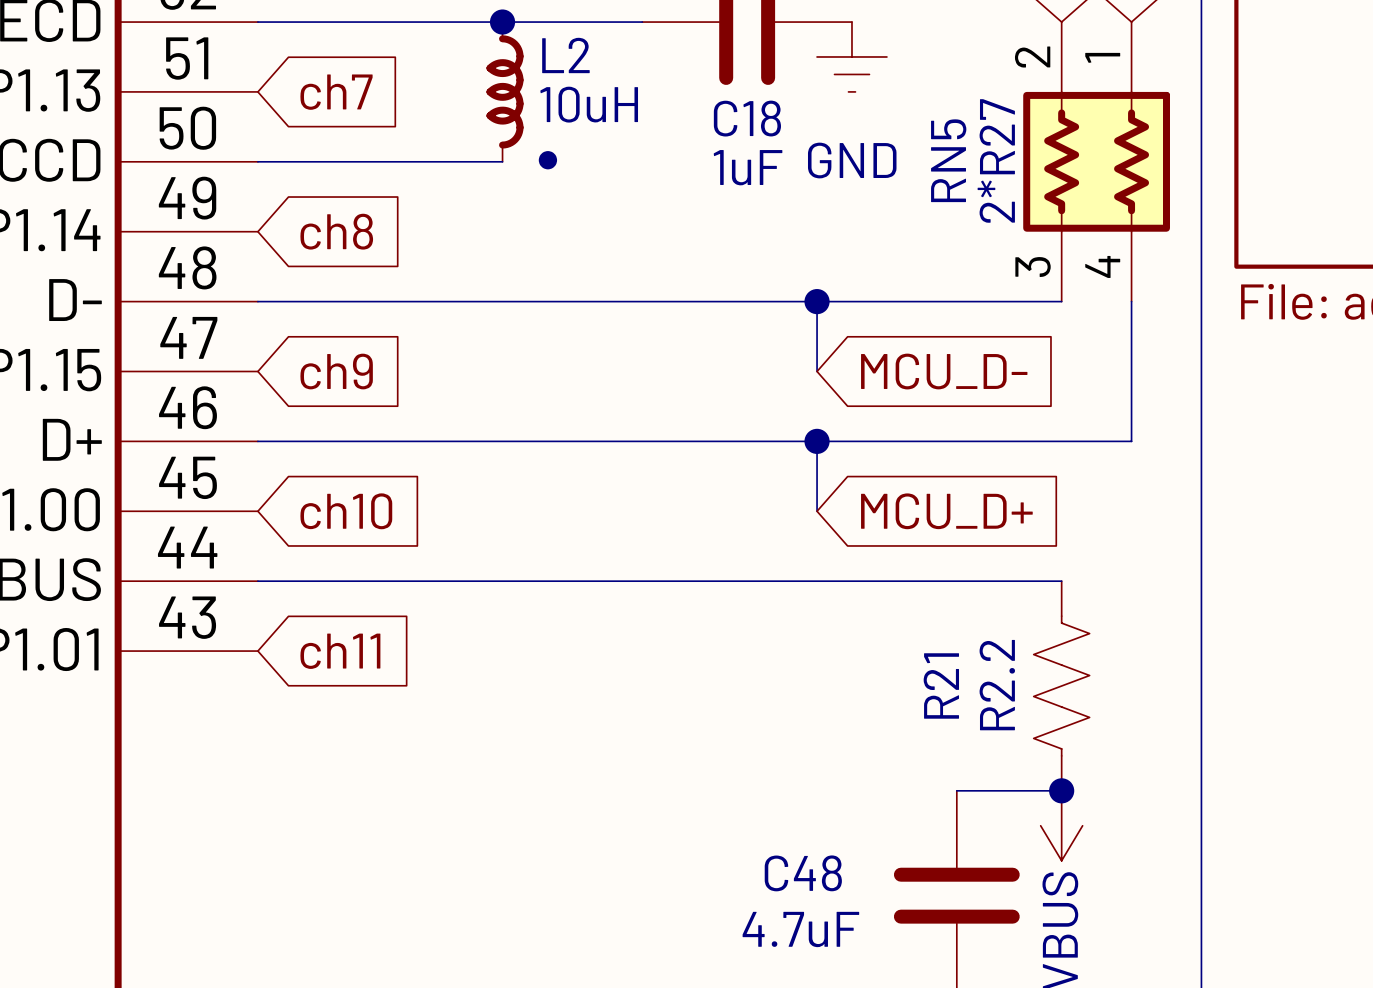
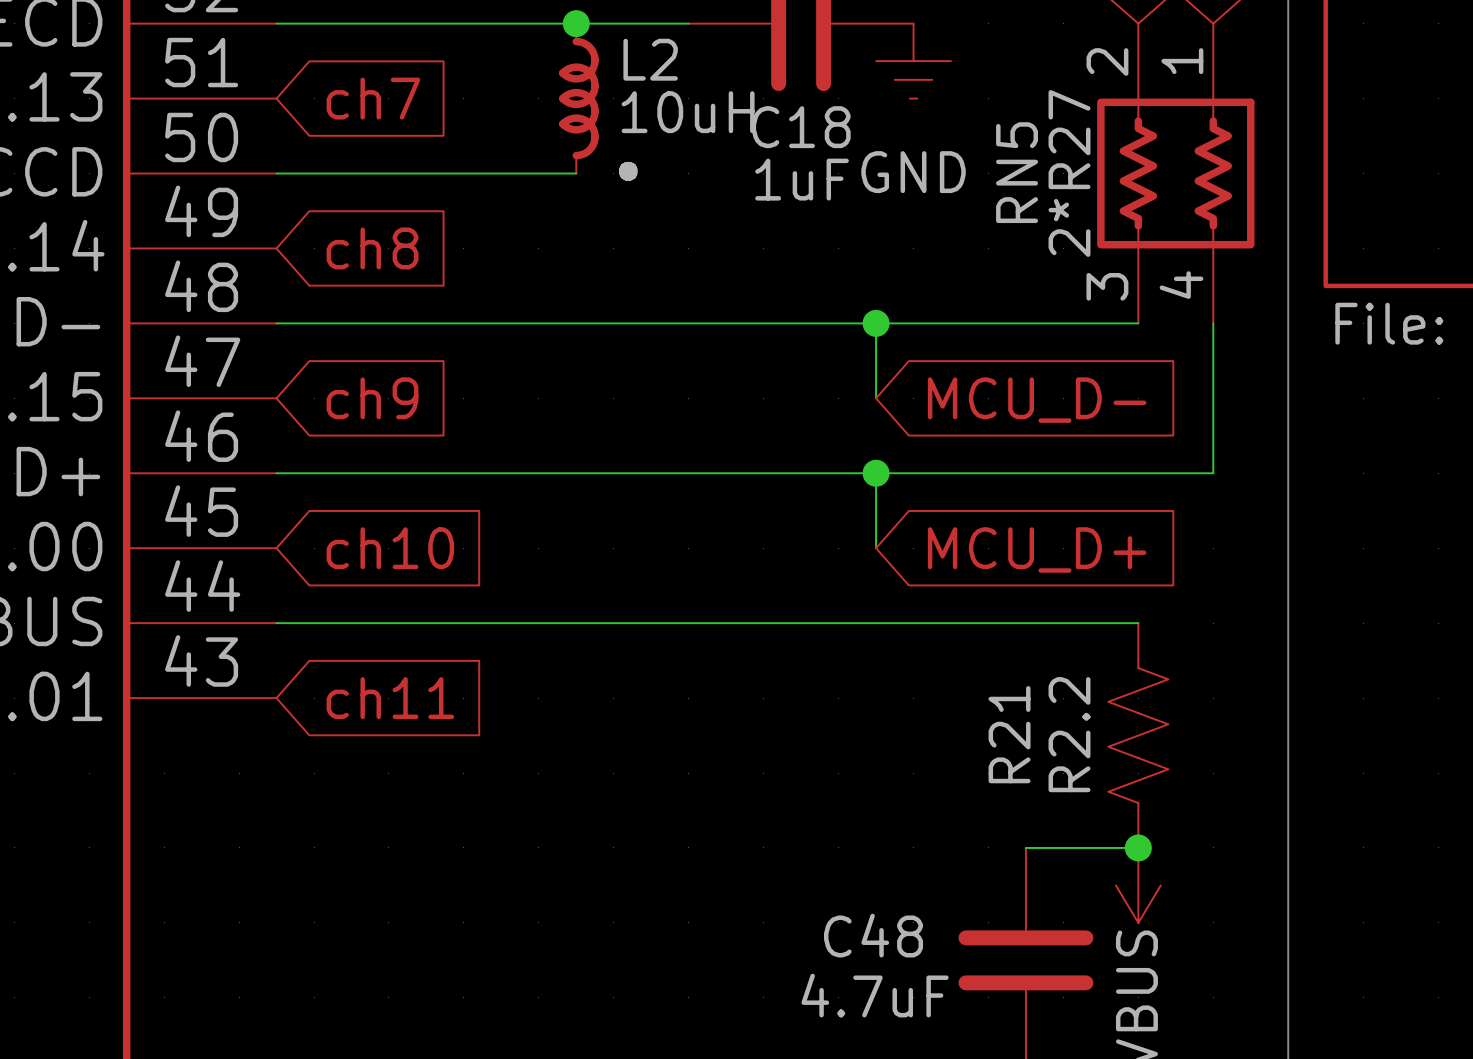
junction position: (502, 22) -> (576, 23)
L2 position: (504, 91) -> (578, 98)
wire: none -> (538, 173) (576, 173)

